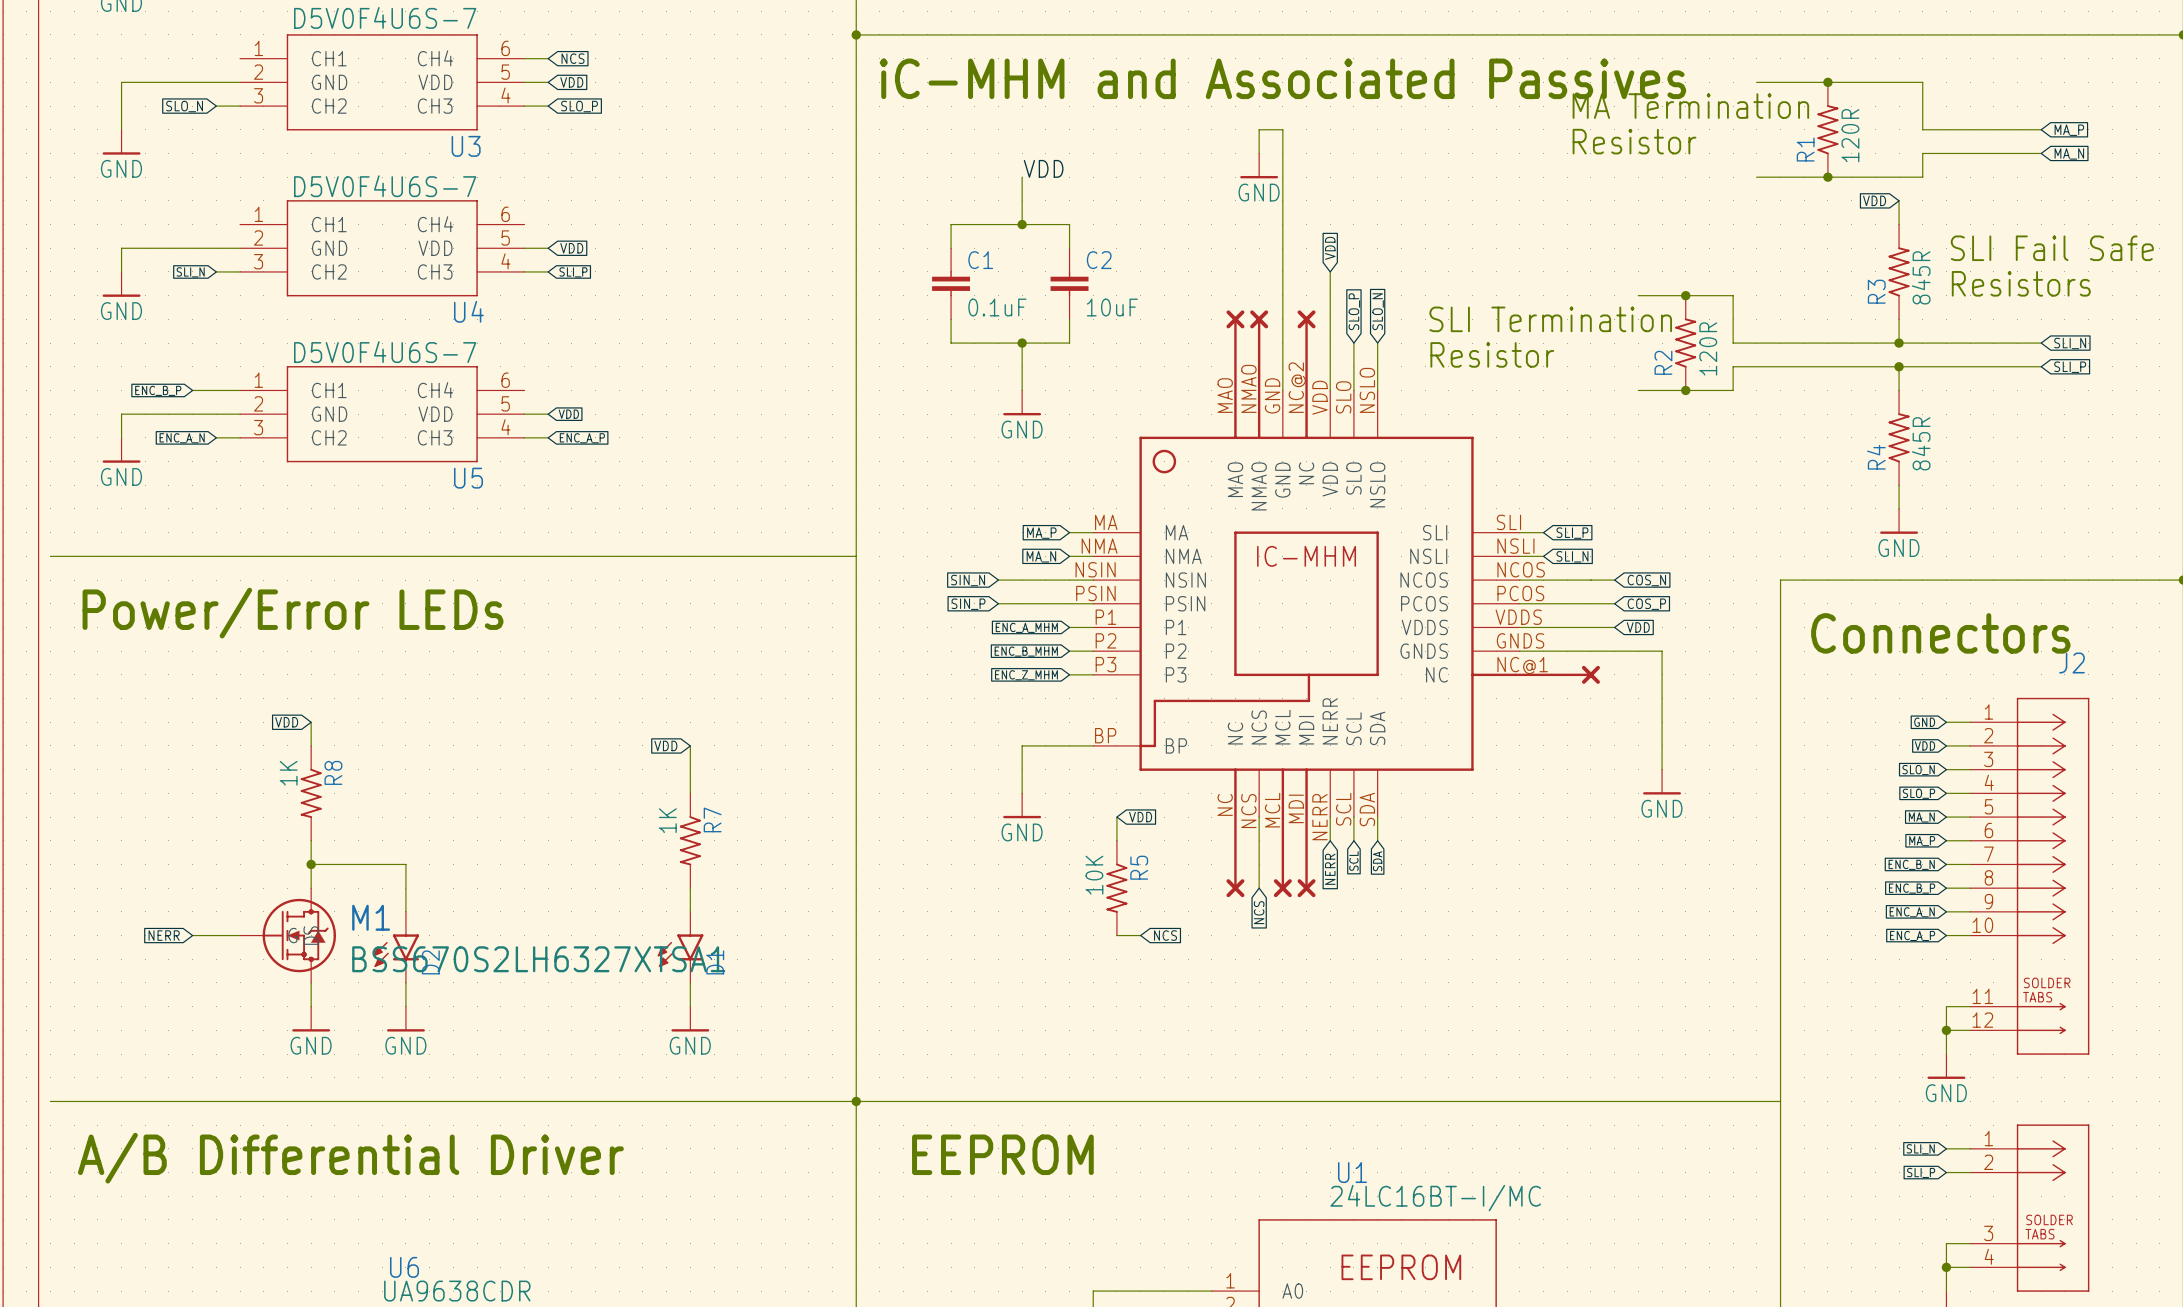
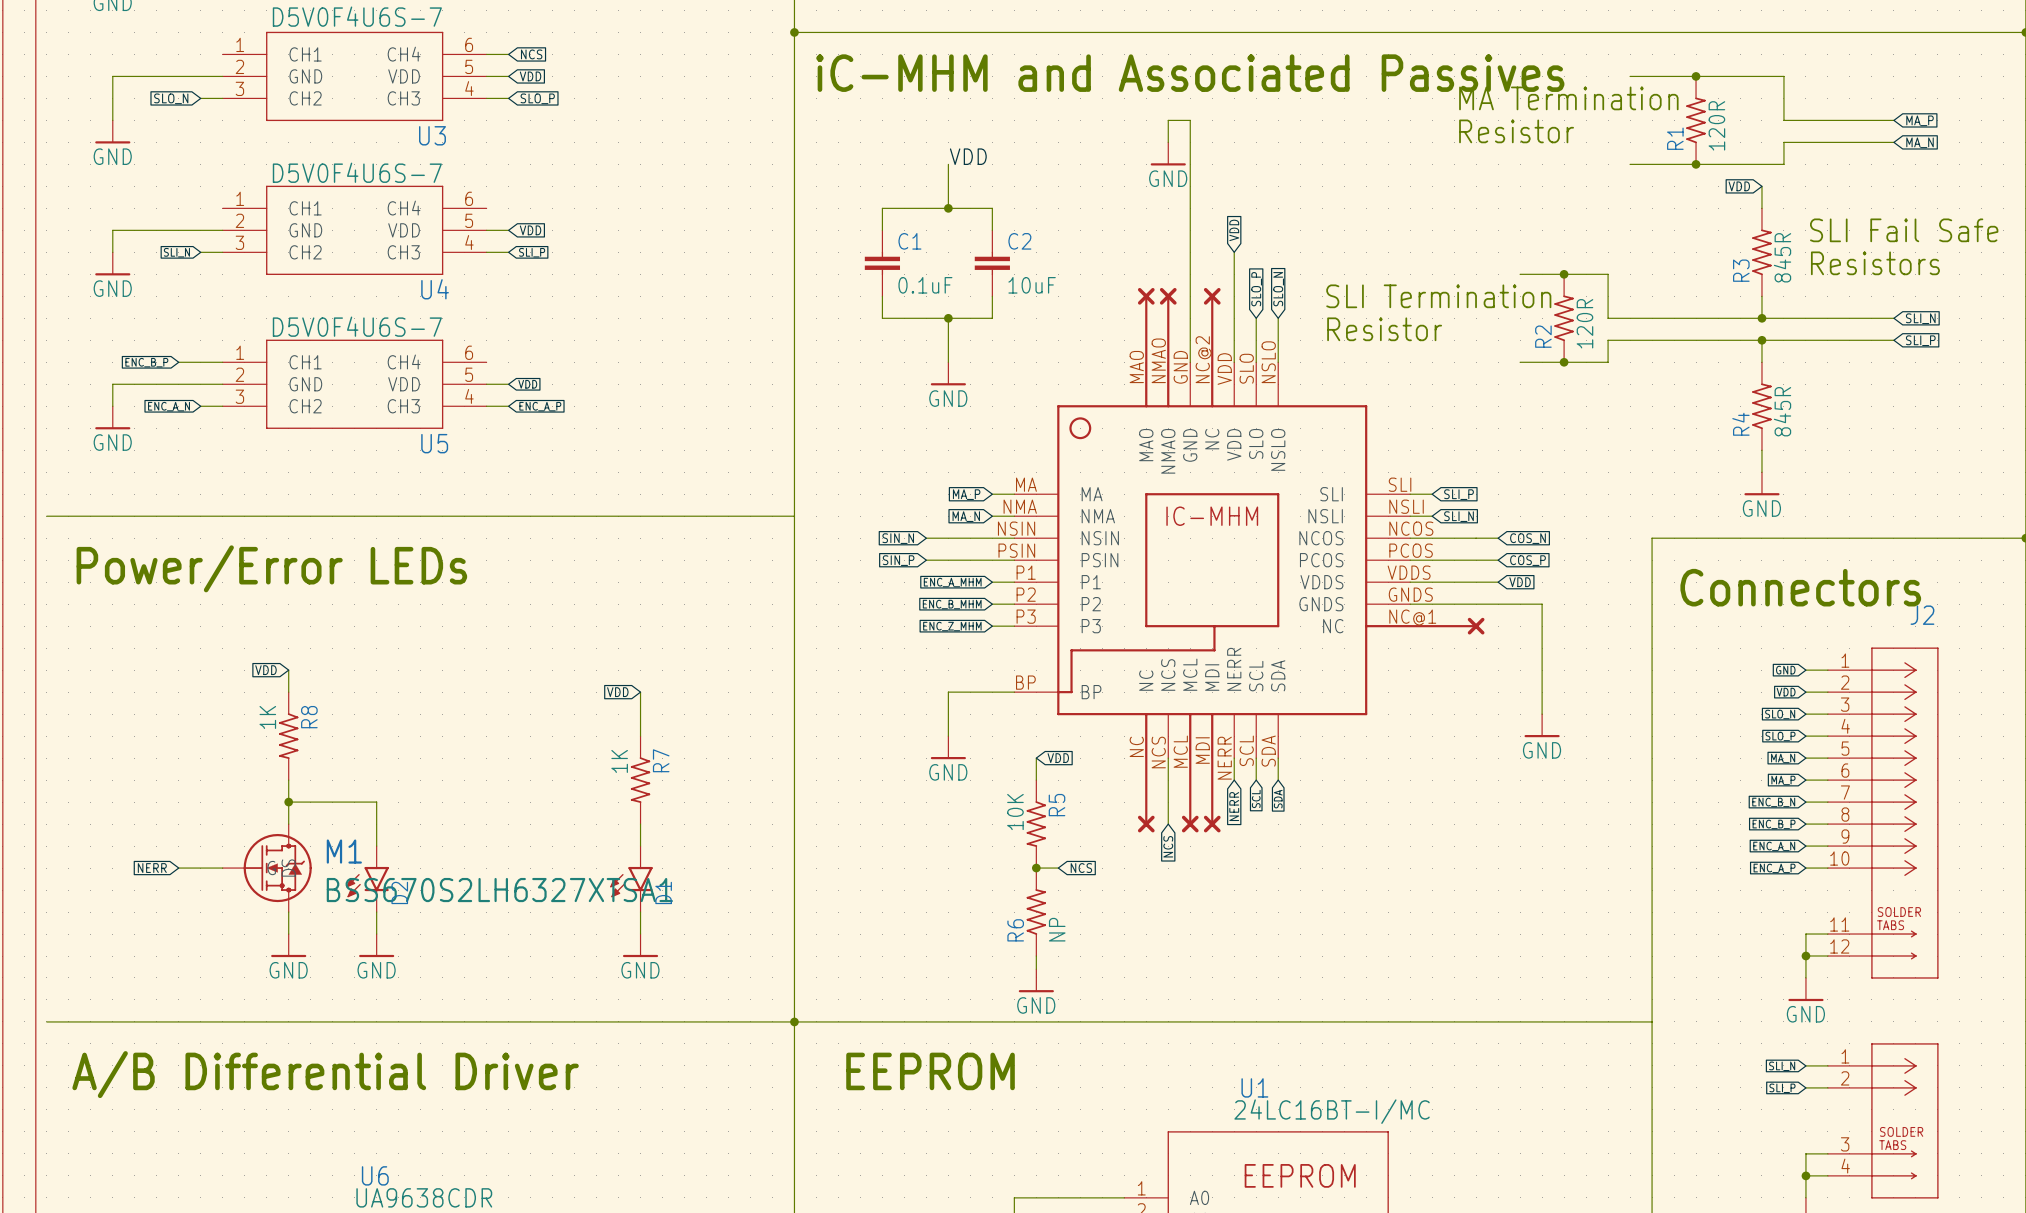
junction: none -> (1036, 868)
R6: none -> NP (1036, 912)
wire: none -> (1036, 956) (1036, 969)
power symbol: none -> GND (1036, 980)

